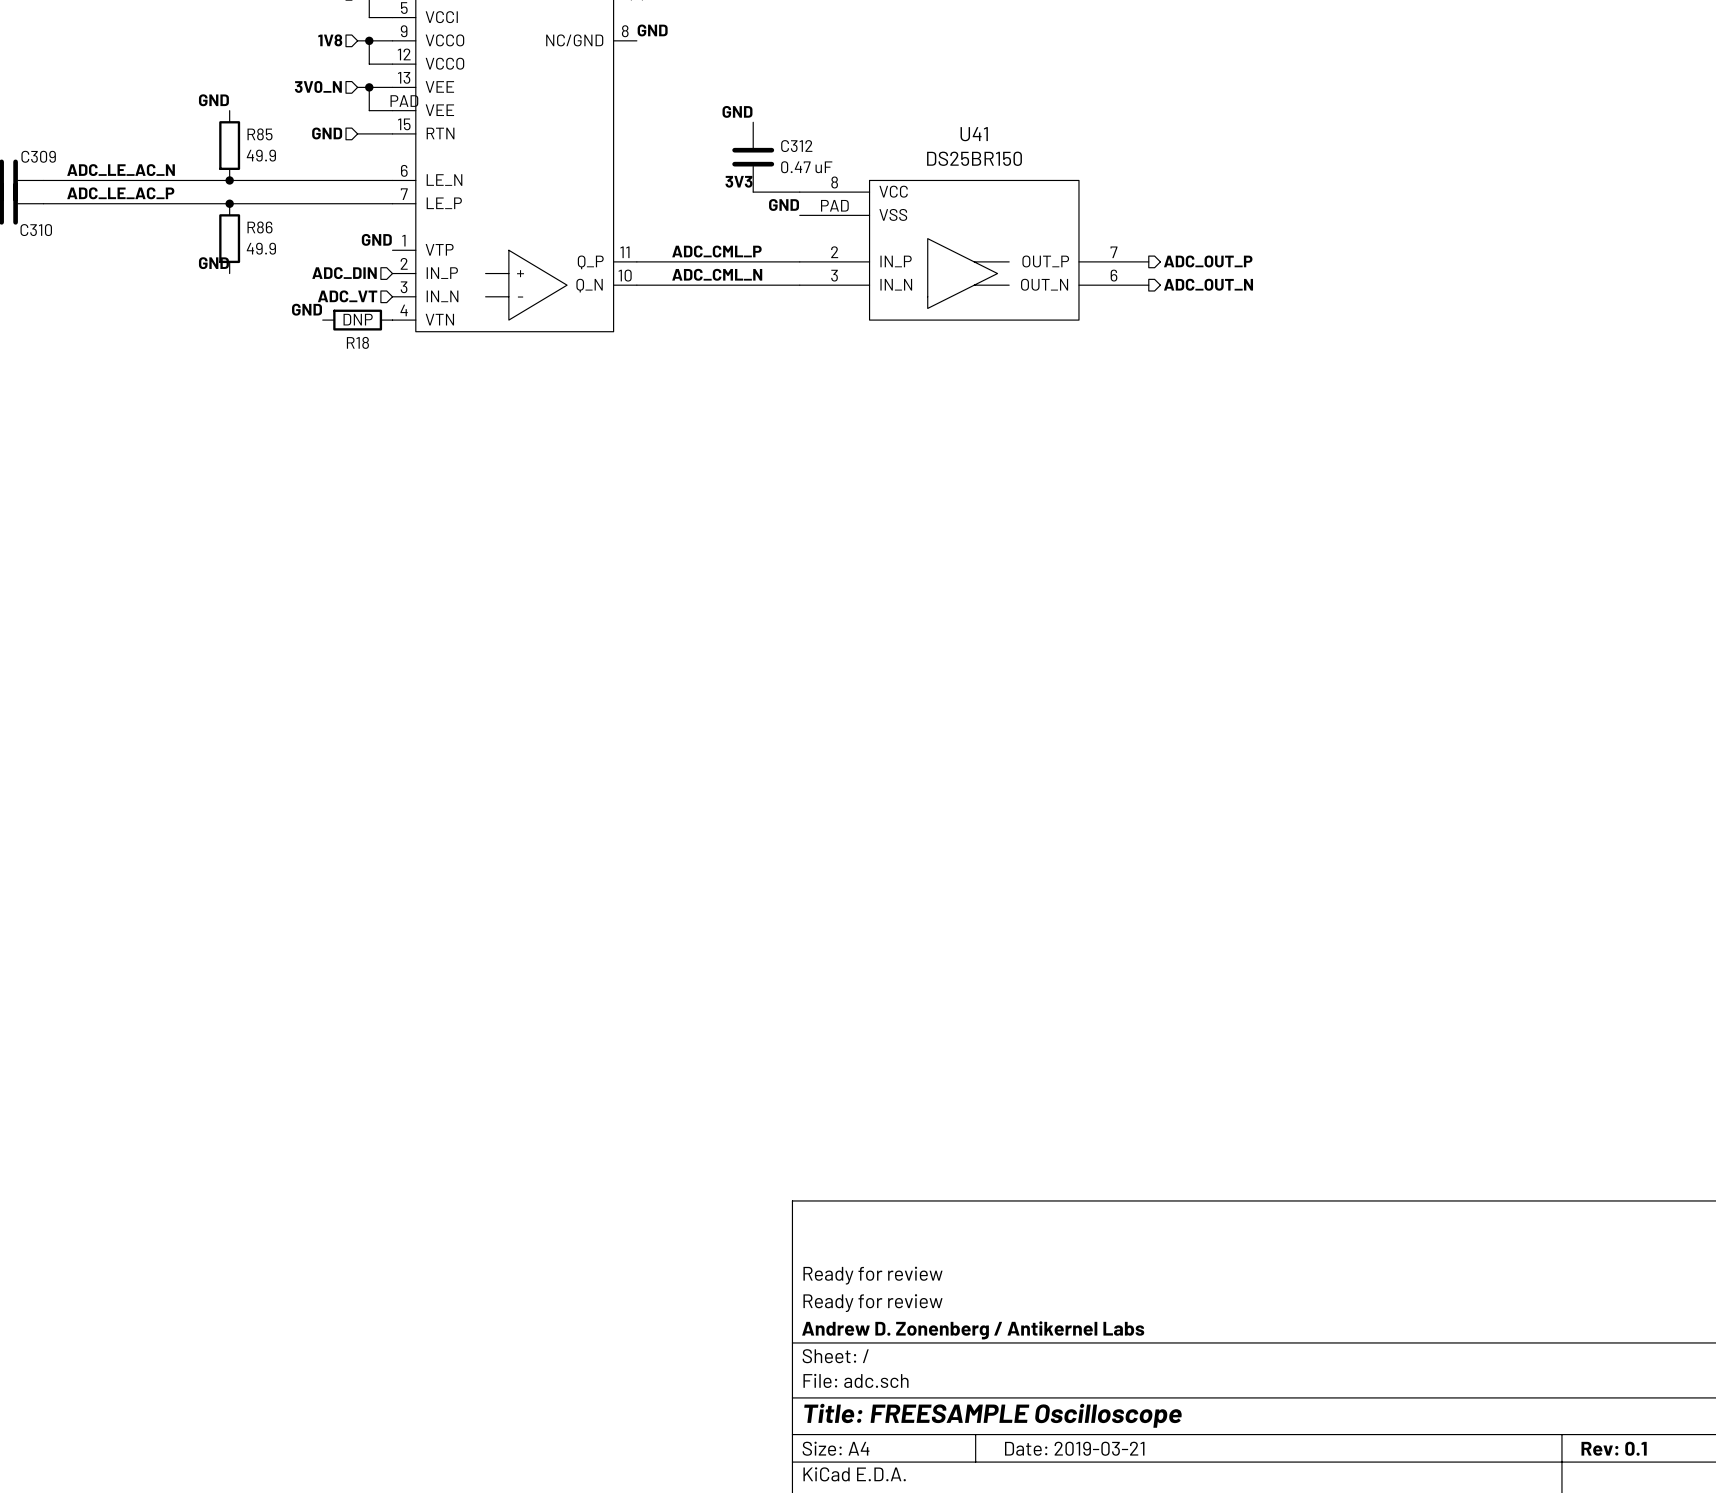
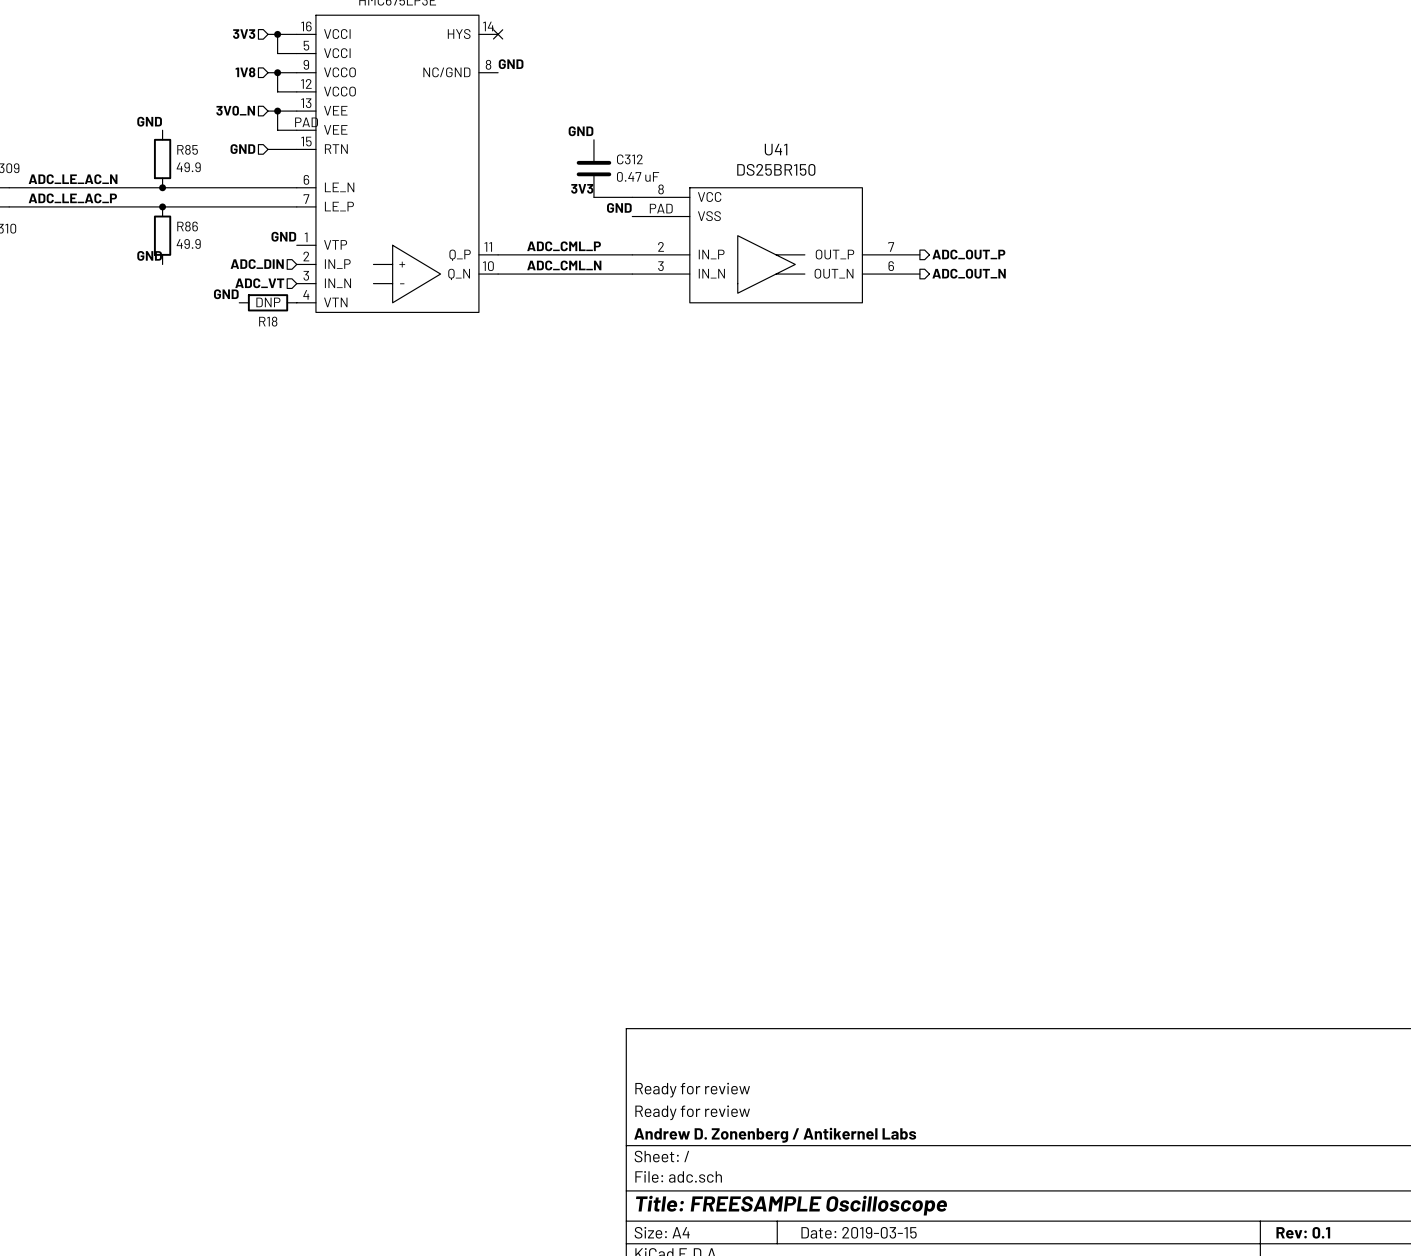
title block: Date: 2019-03-21 (1074, 1448) -> Date: 2019-03-15 (859, 1232)

